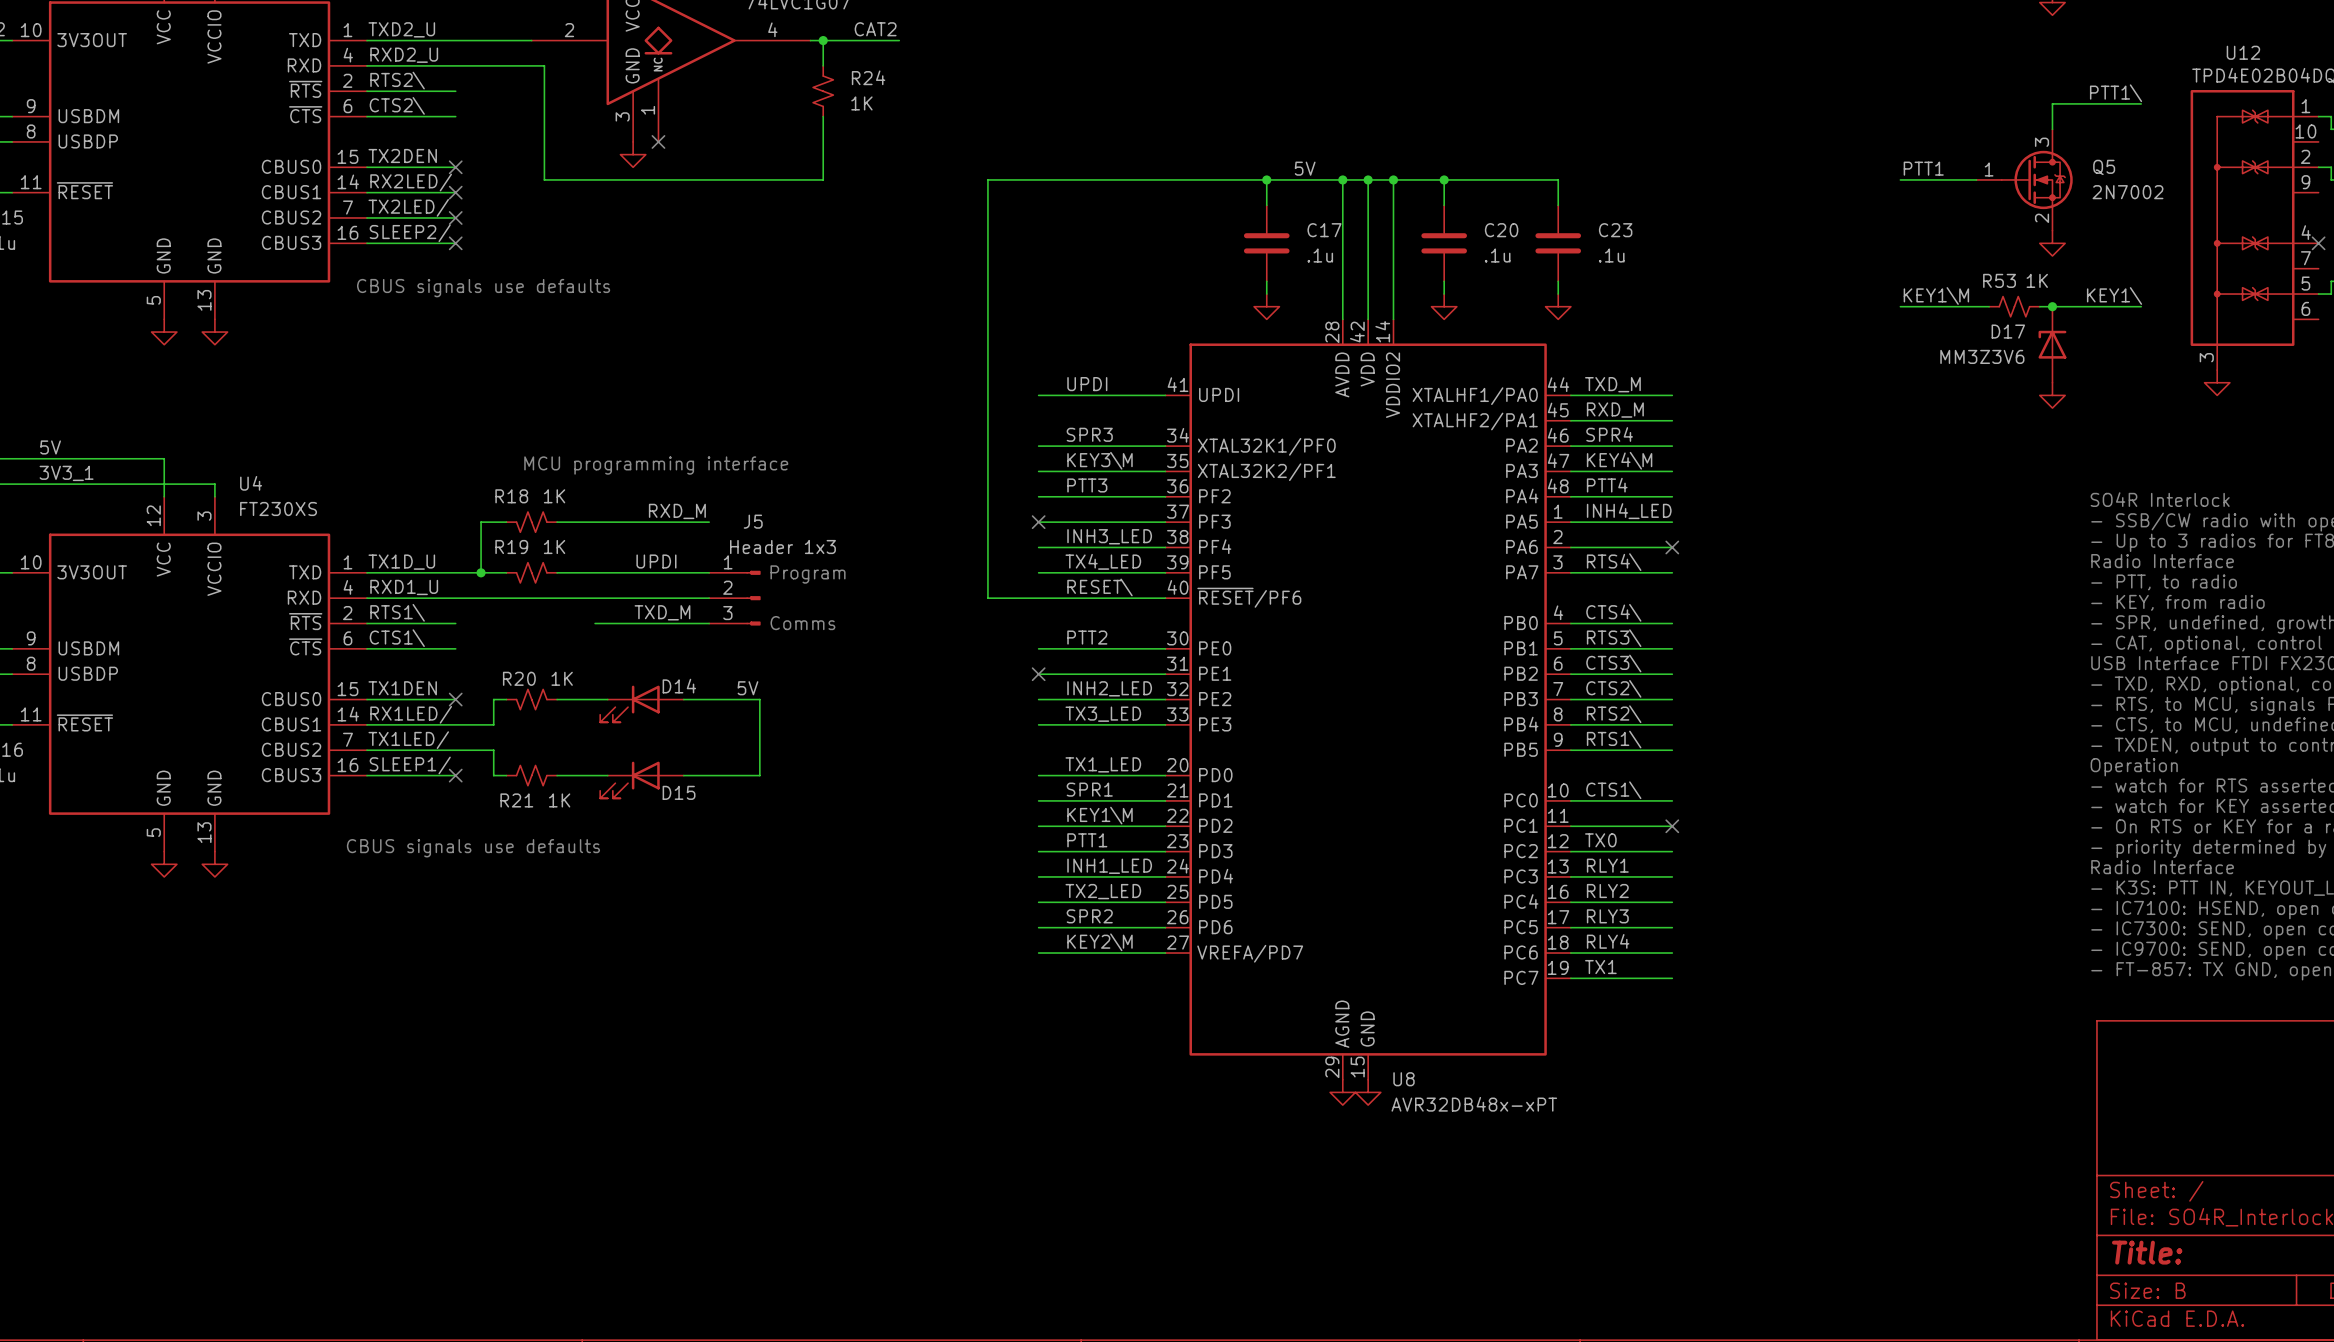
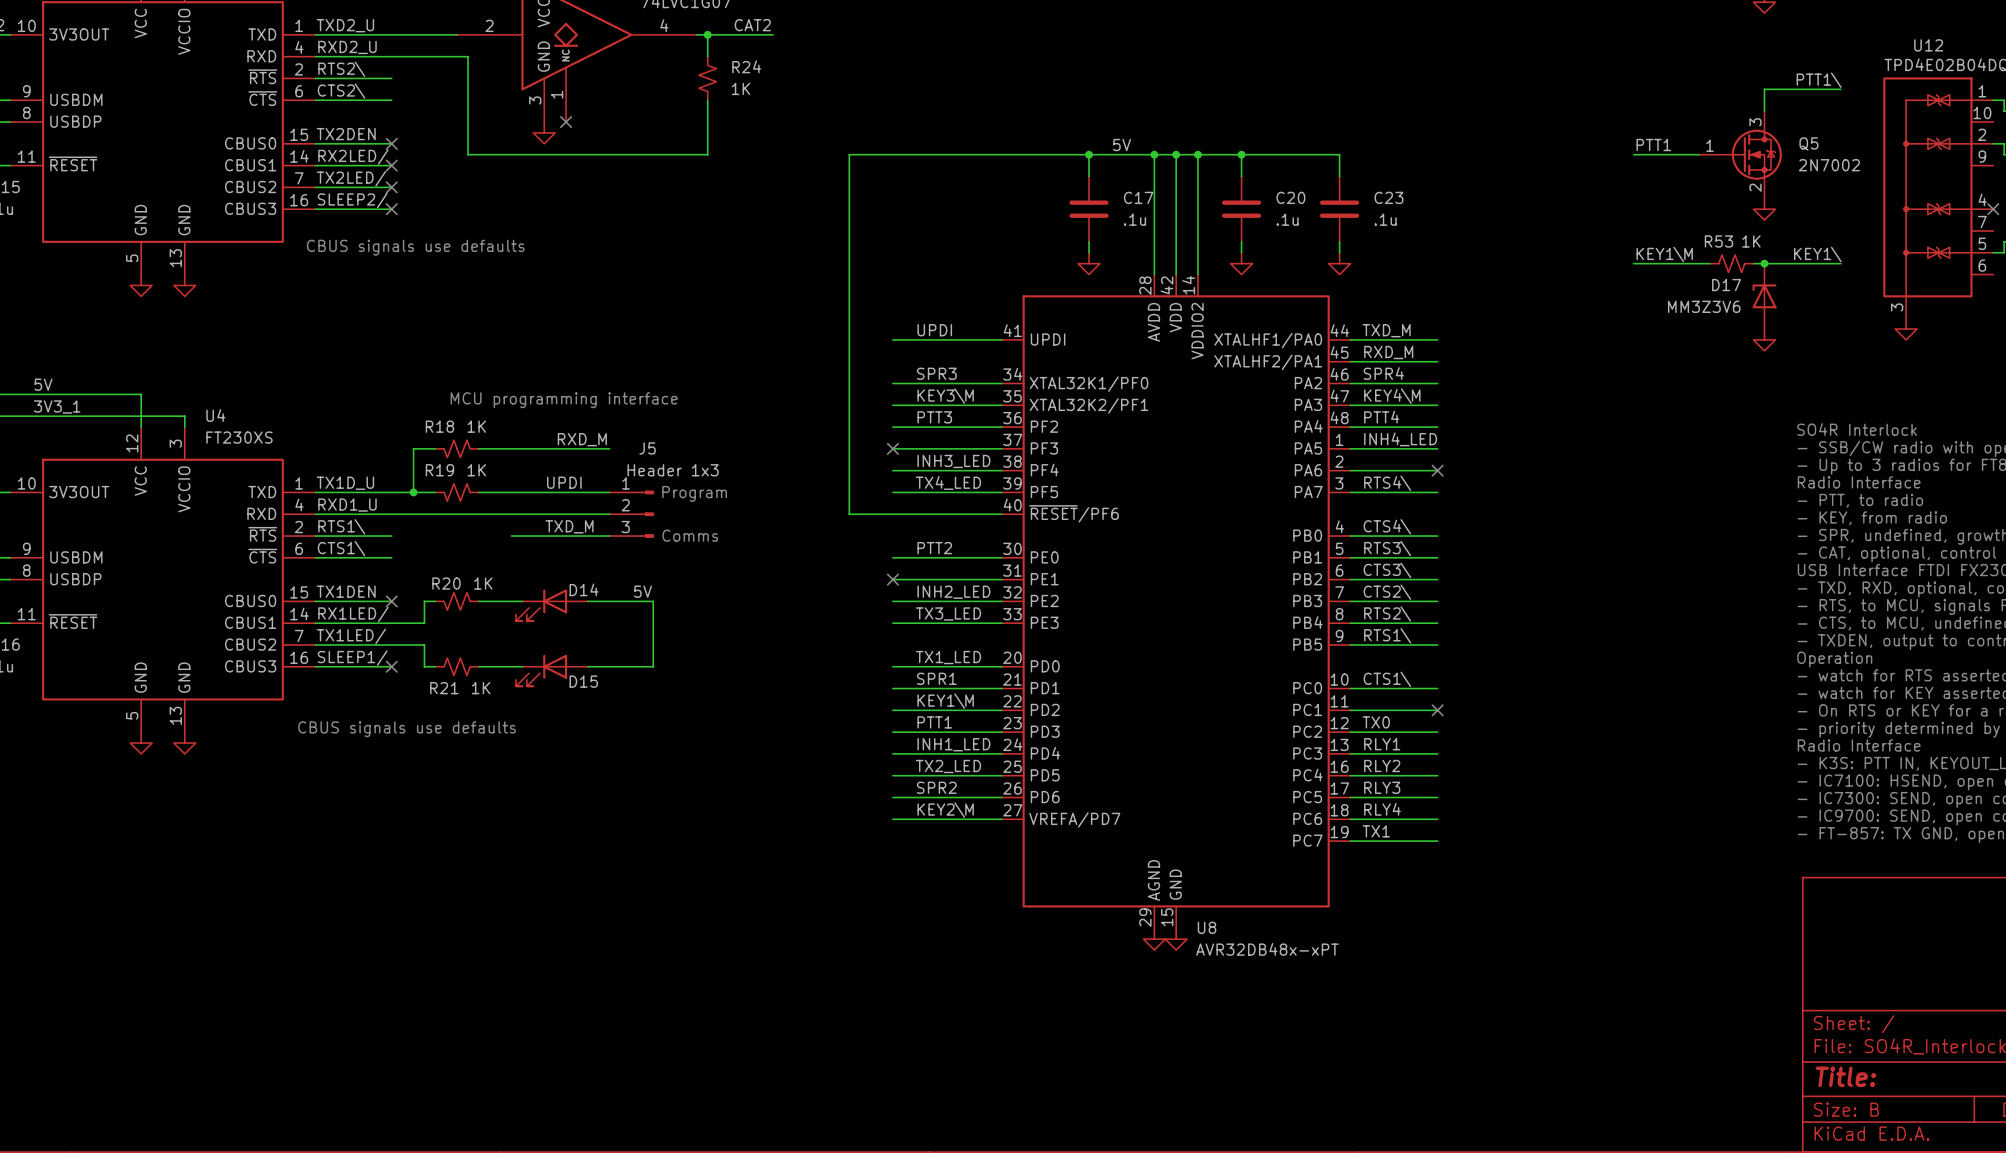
label: RESET\ (1099, 587) -> none

